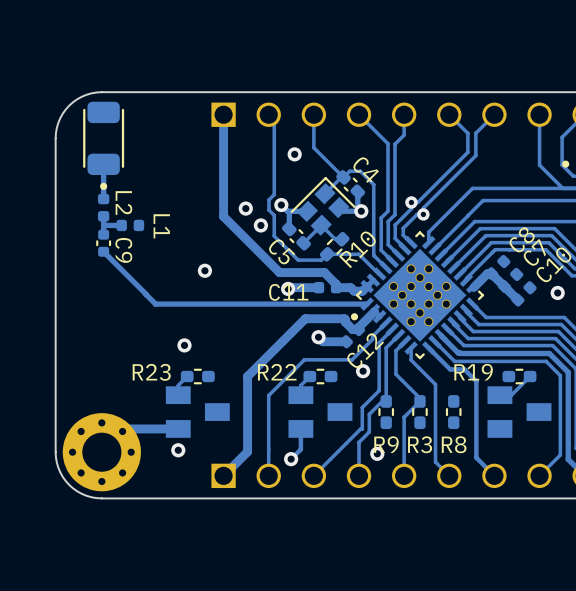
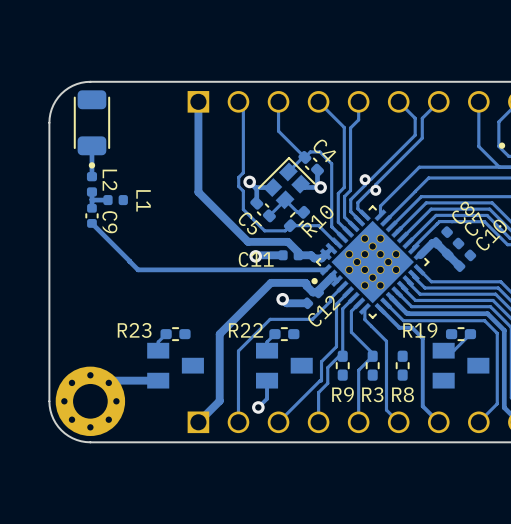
via: (294, 154) -> none
via: (245, 208) -> none
via: (260, 225) -> none
via: (204, 270) -> none
via: (557, 292) -> none
via: (184, 345) -> none
via: (363, 371) -> none
via: (178, 450) -> none
via: (377, 453) -> none

